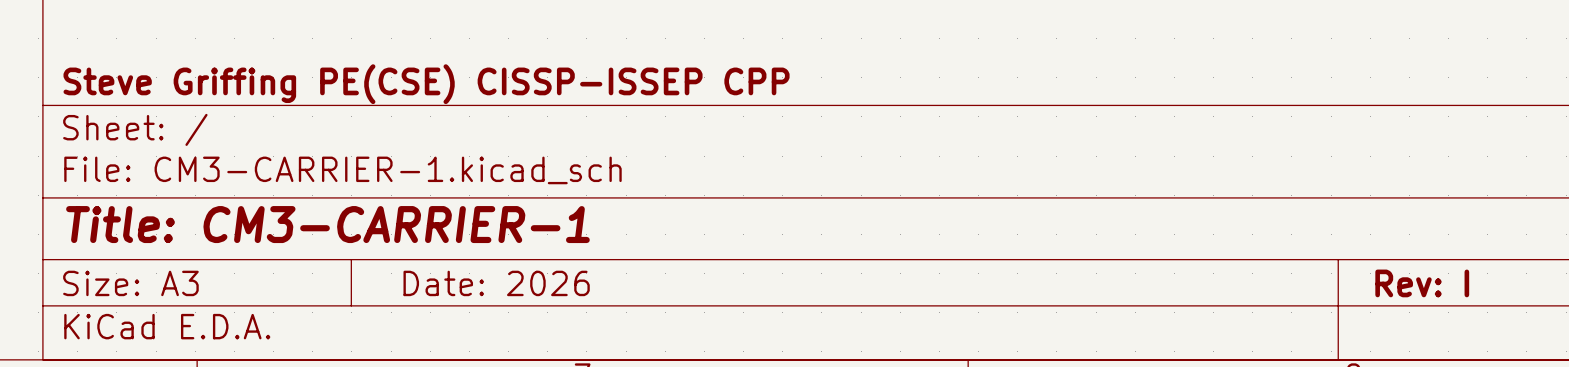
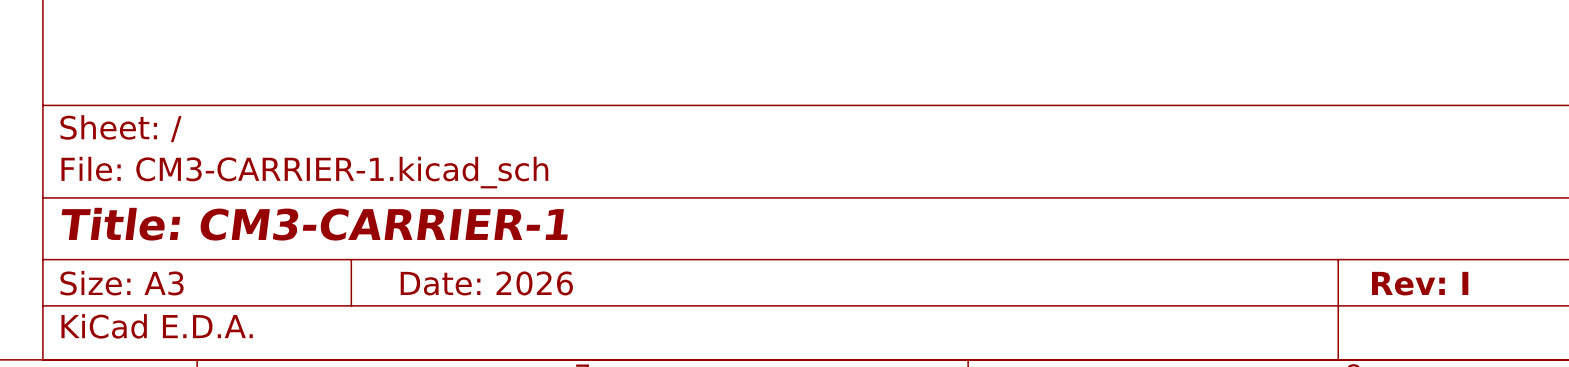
title block: Steve Griffing PE(CSE) CISSP-ISSEP CPP (426, 84) -> none

